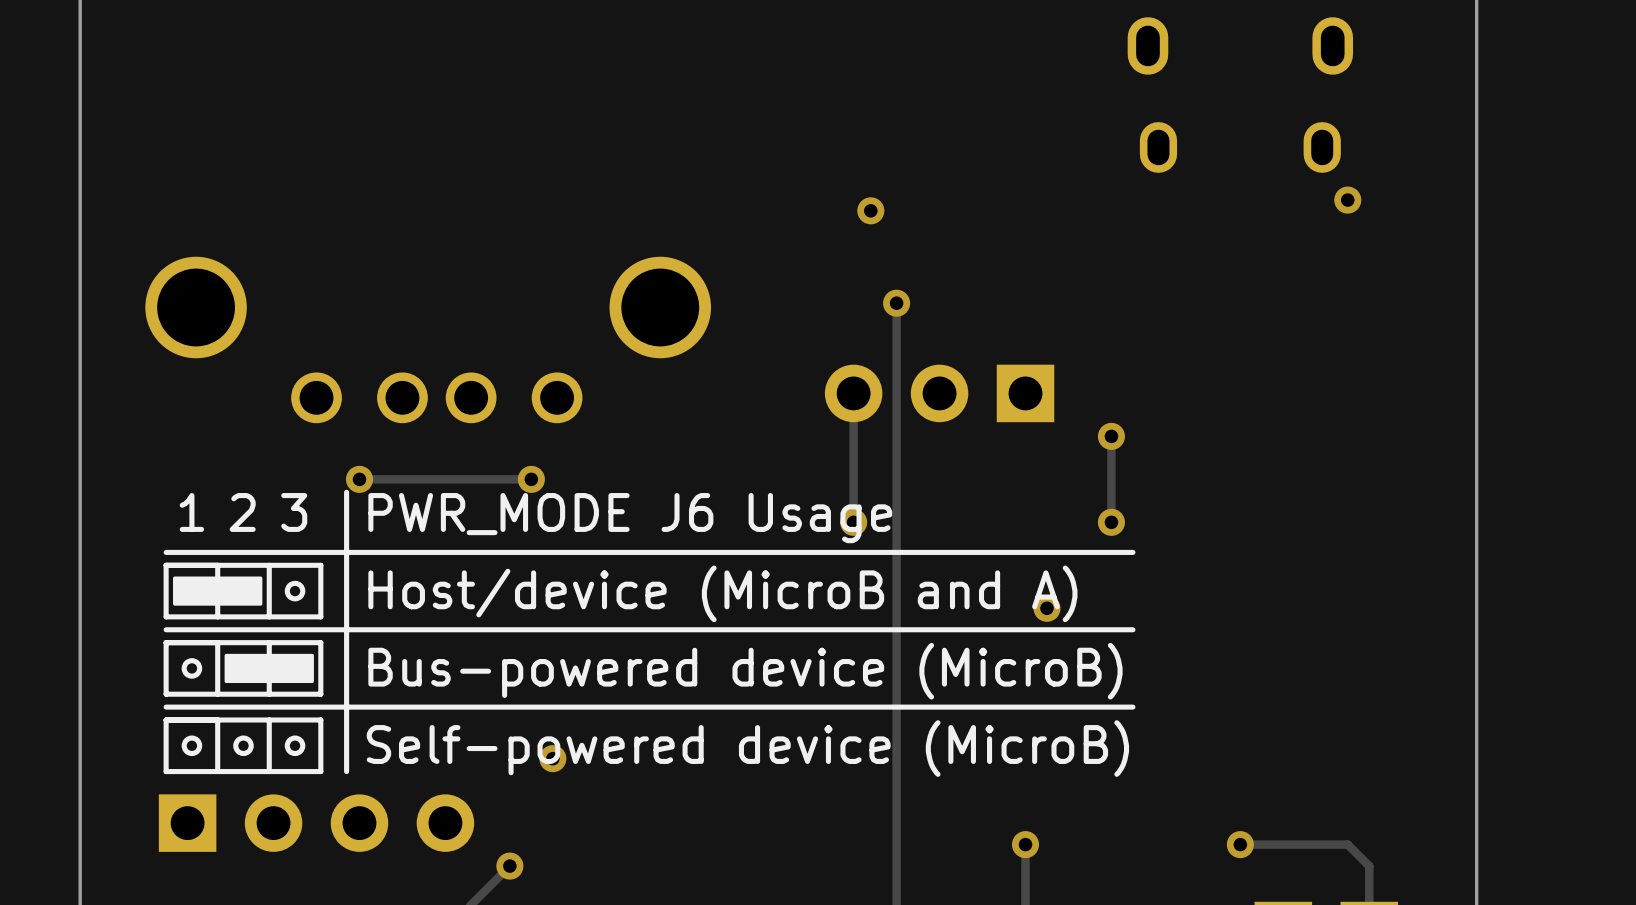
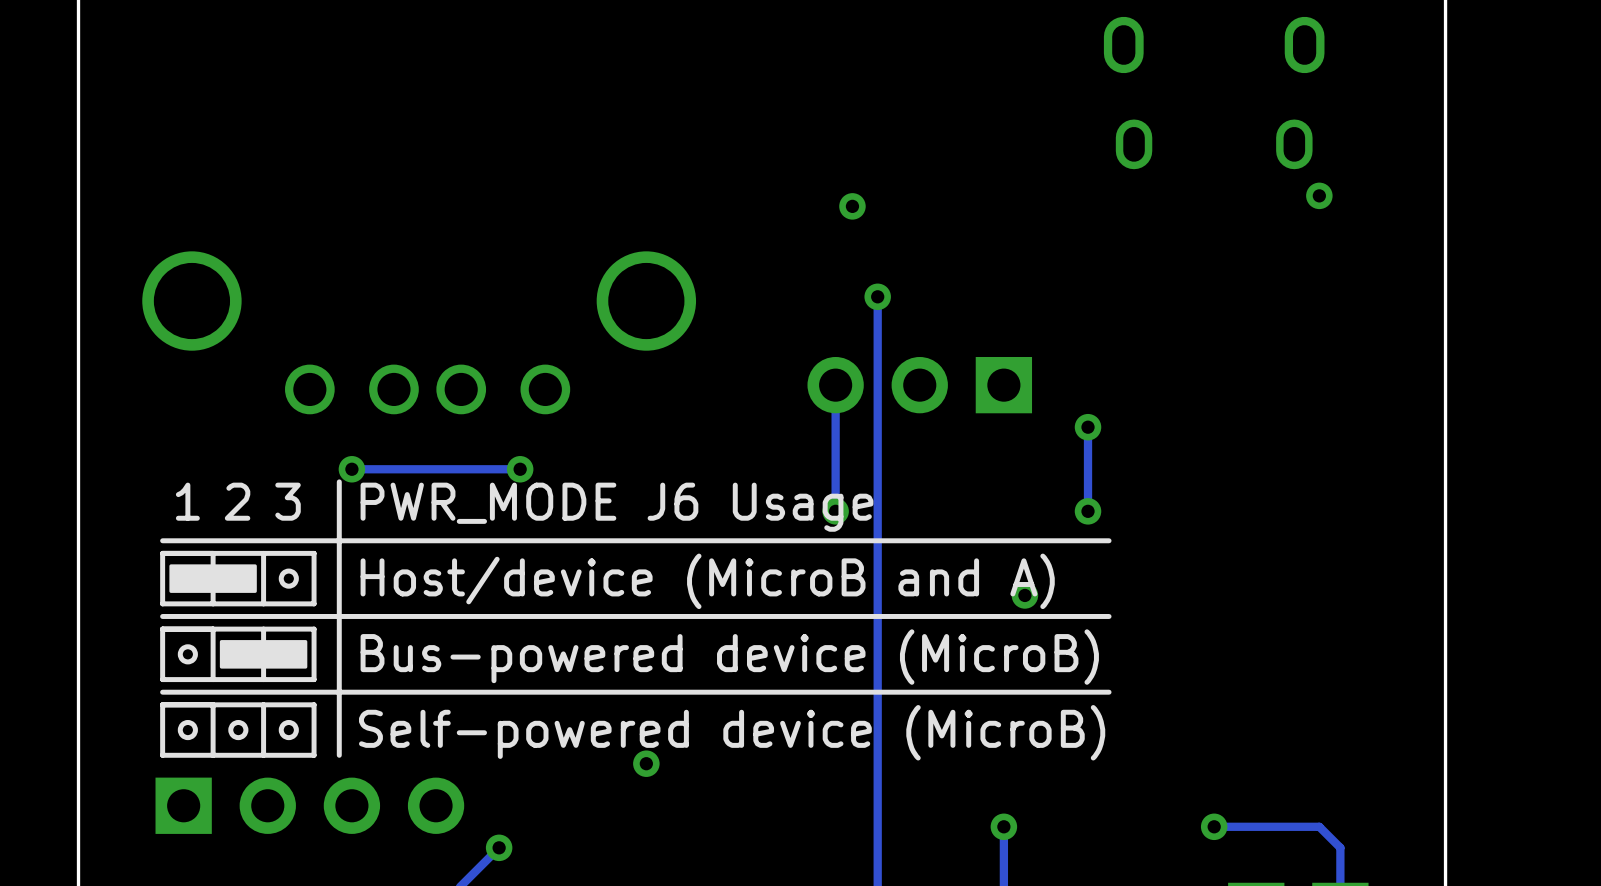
via position: (552, 758) -> (646, 763)

